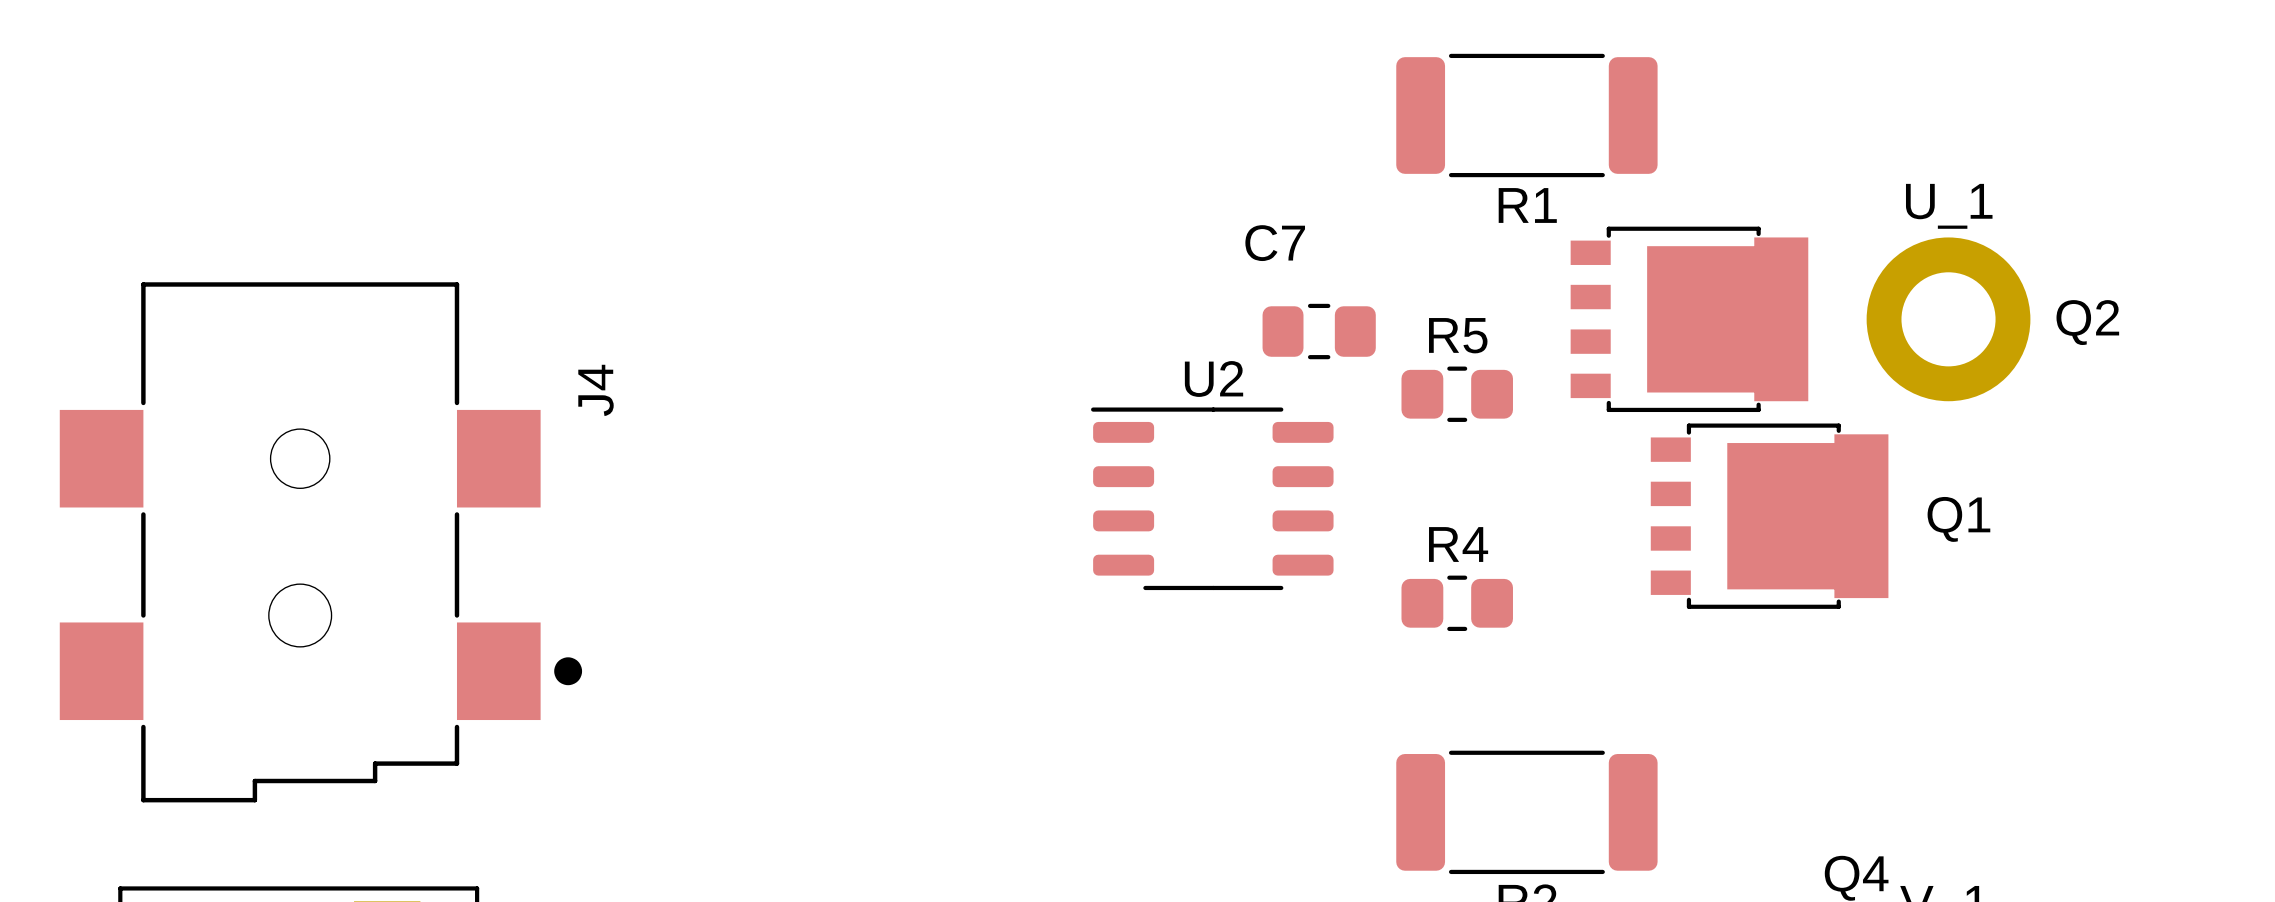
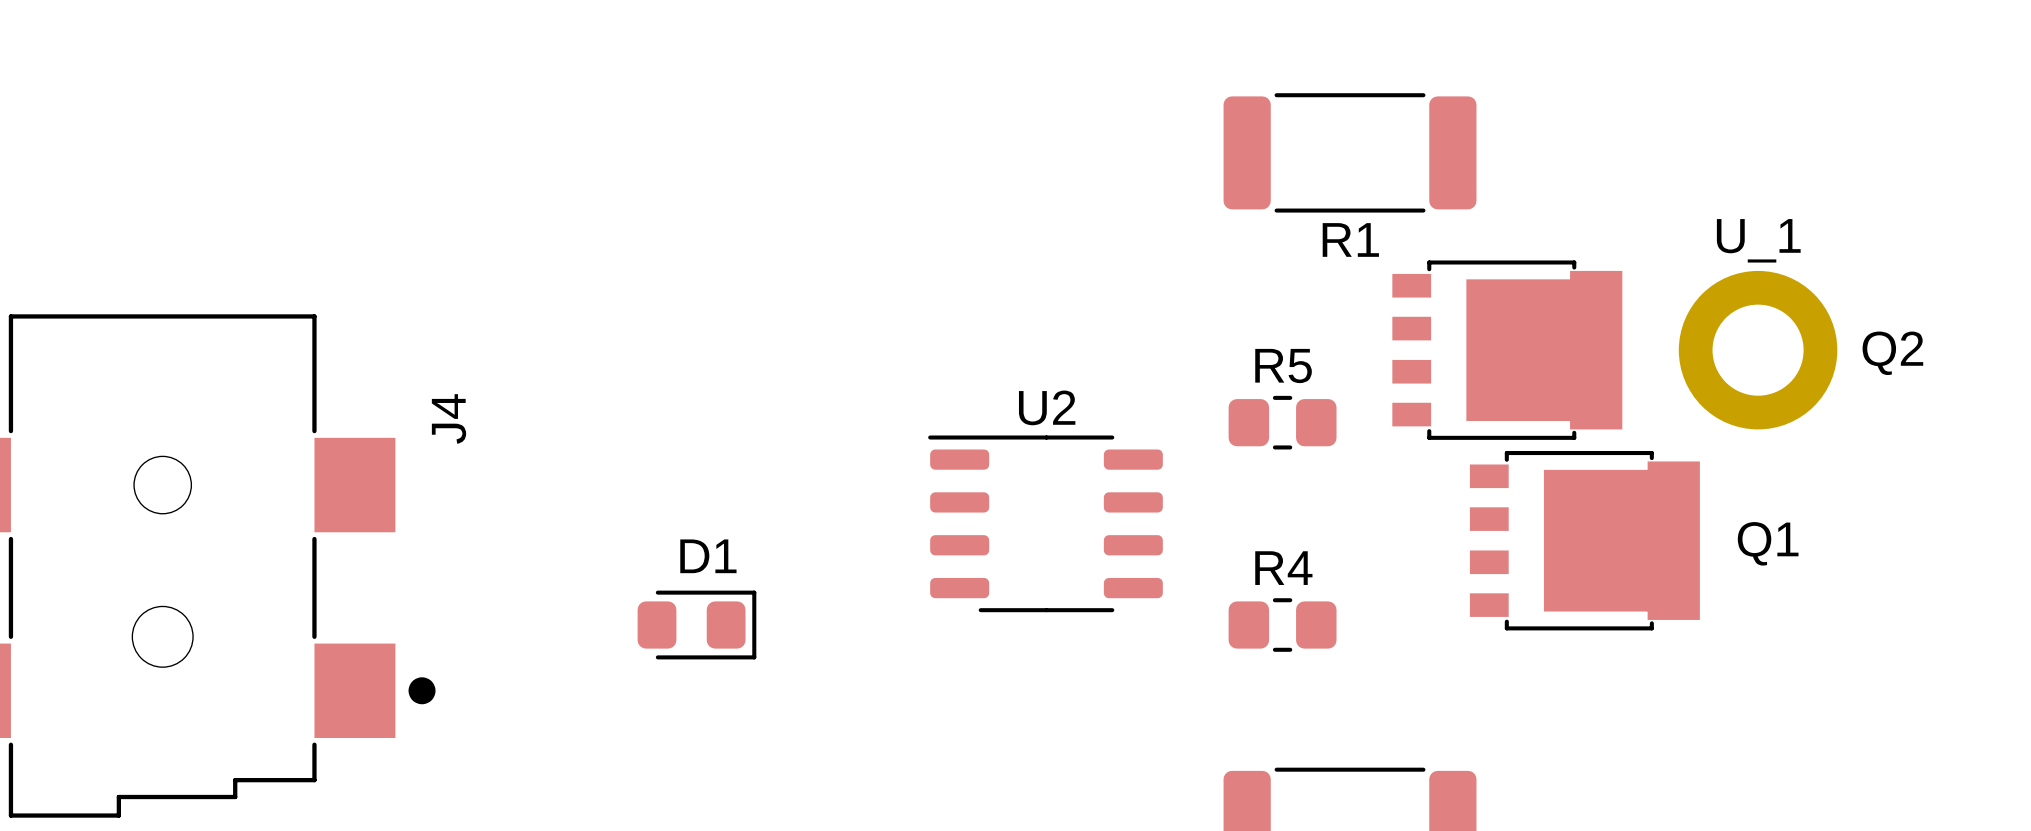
C7: (1319, 331) -> none
D1: none -> (696, 625)

